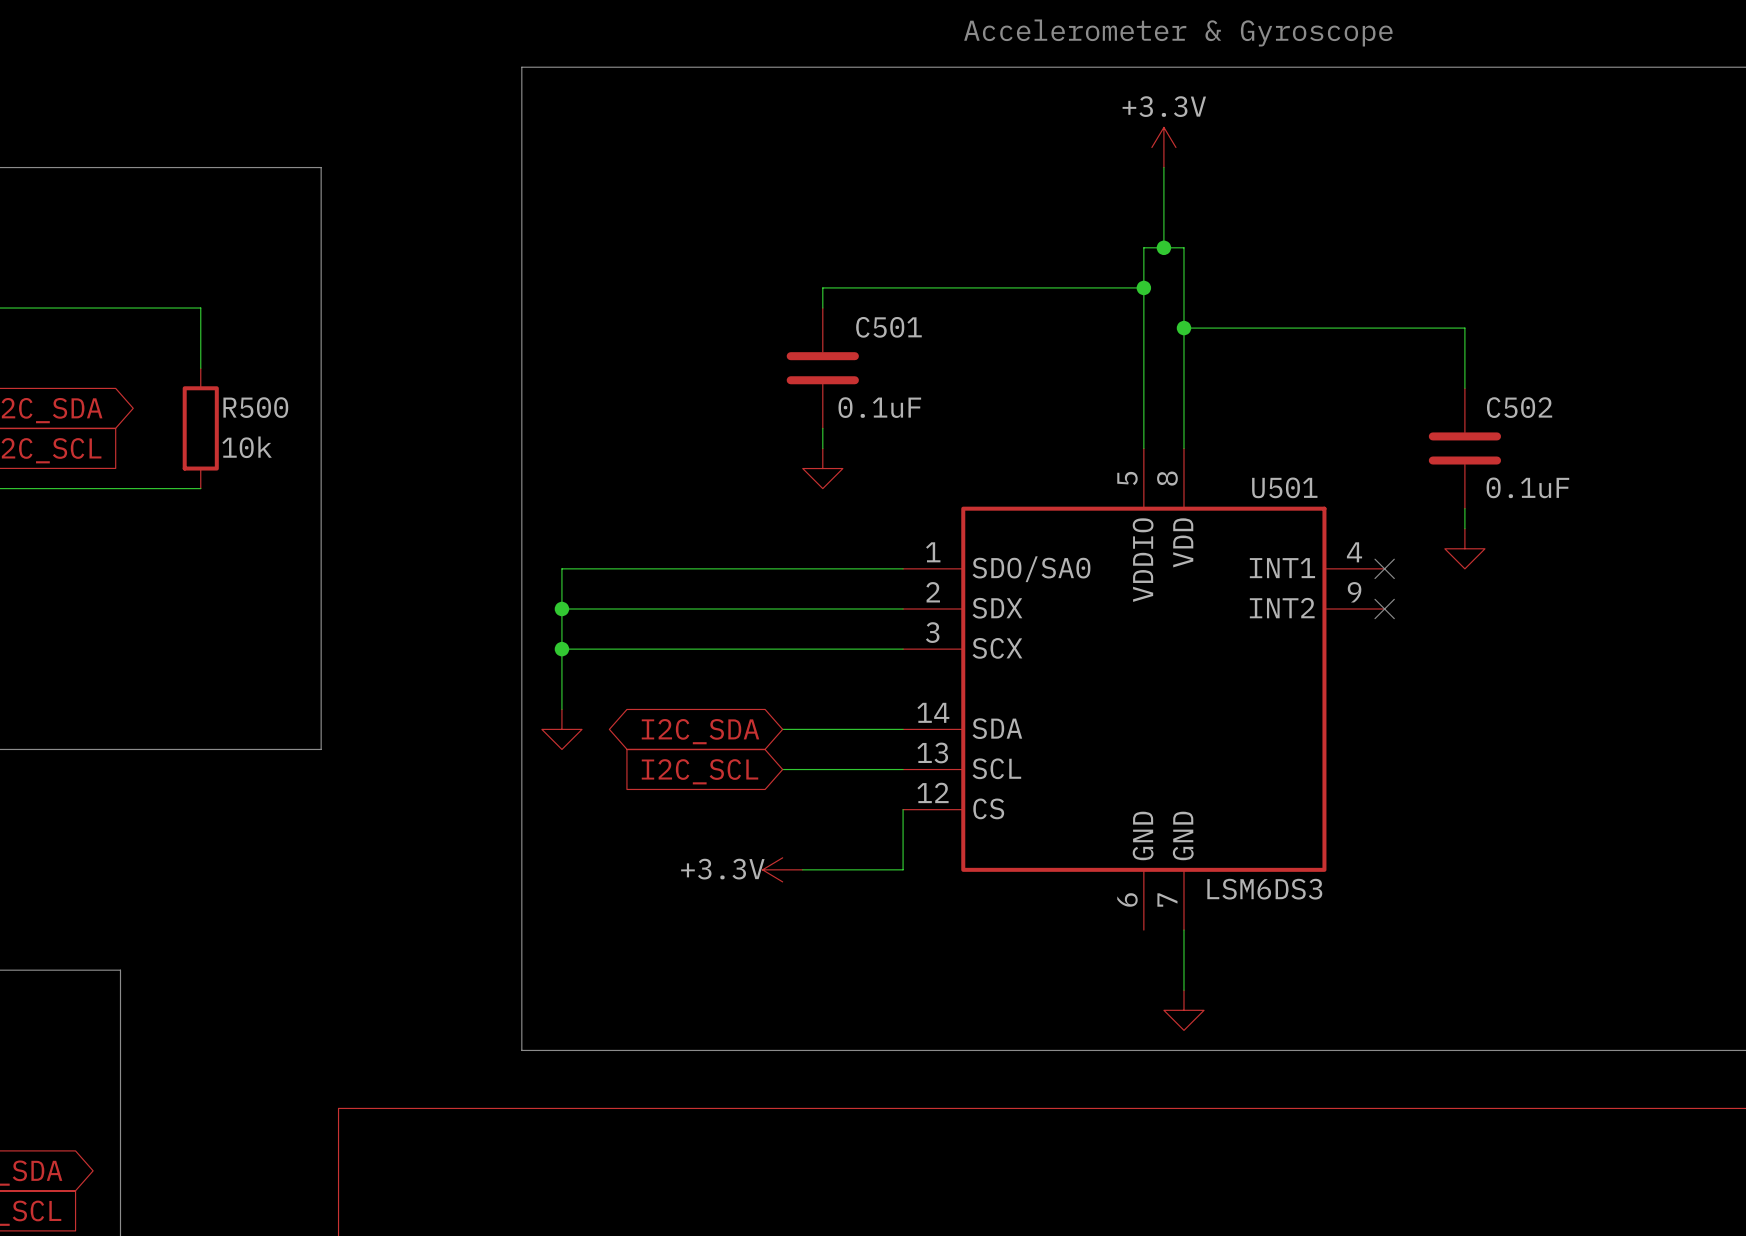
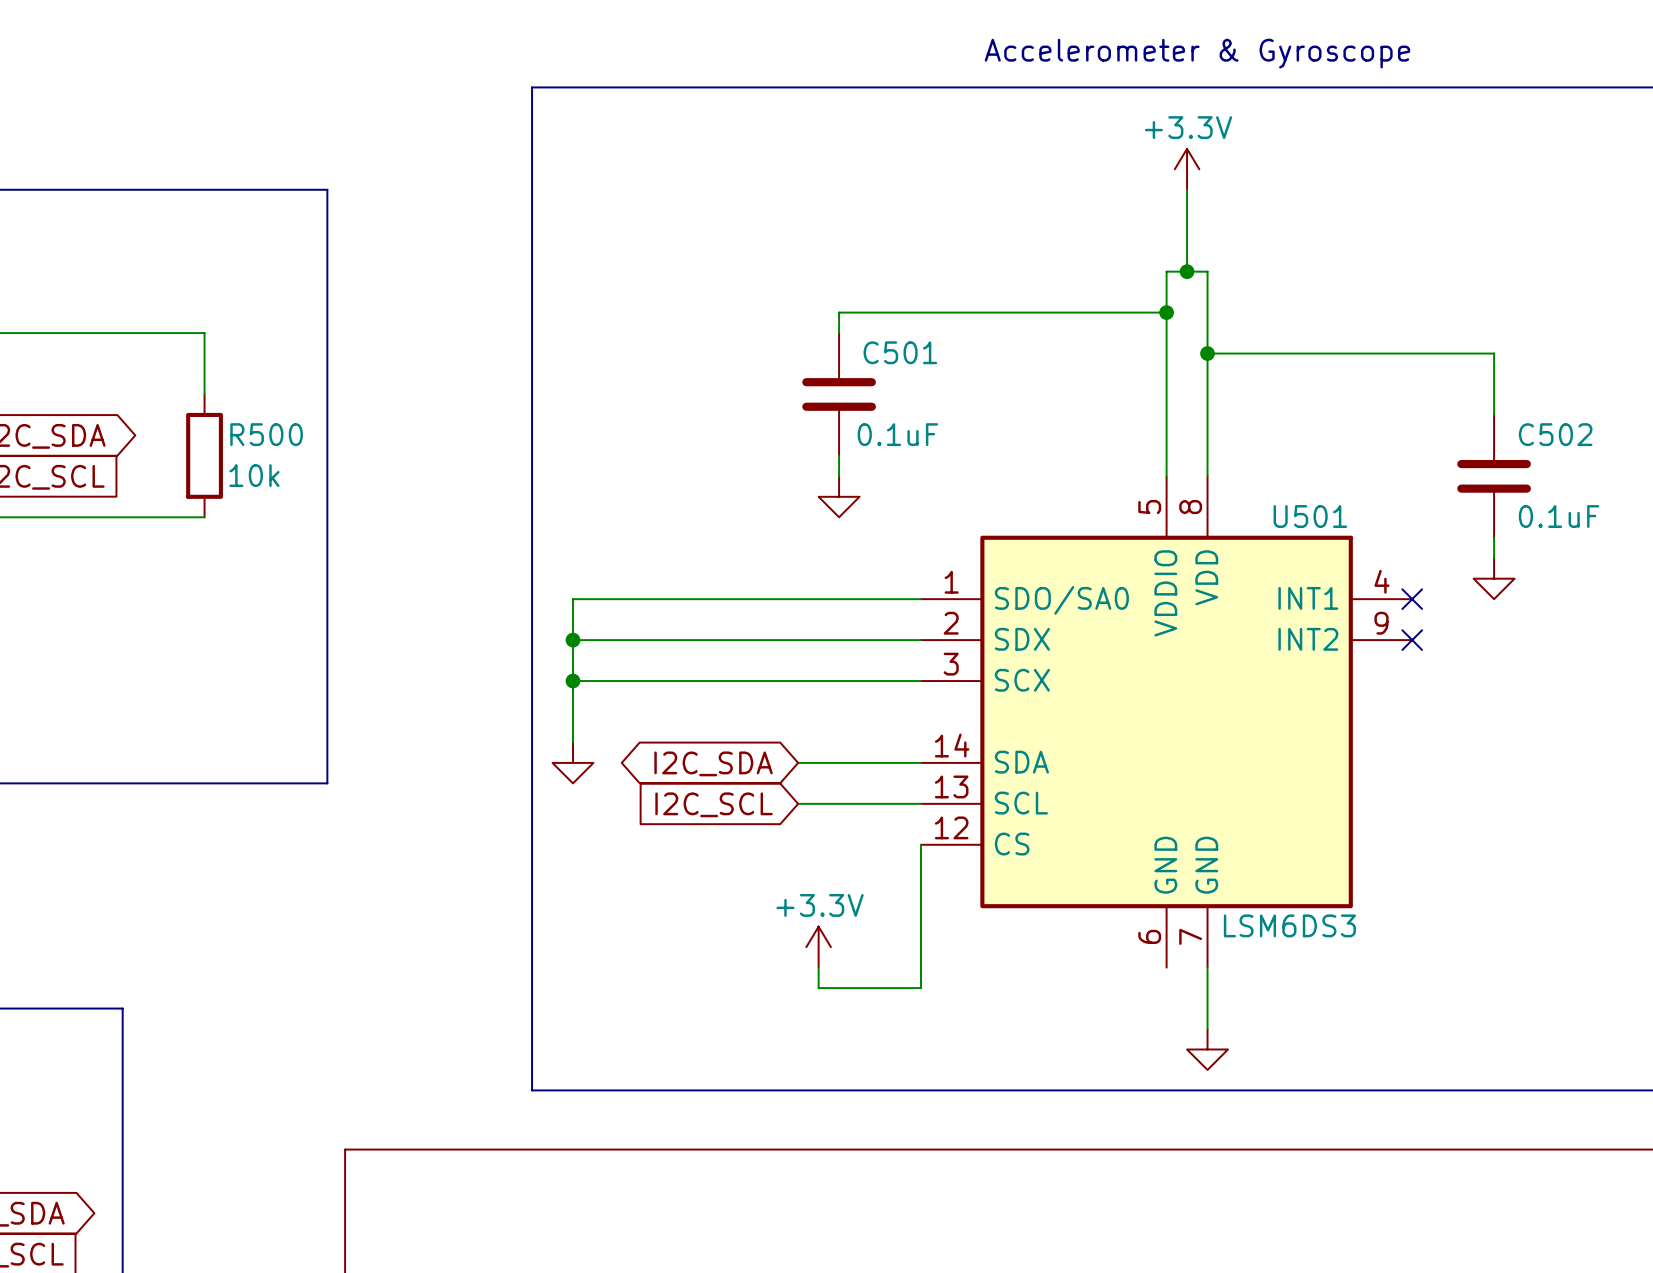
power symbol rotation: 0° (782, 869) -> 90° clockwise (818, 947)
power symbol position: +3.3V (782, 869) -> +3.3V (818, 947)
wire: (802, 869) (903, 869) -> (818, 967) (818, 988) (920, 988) (920, 906)

